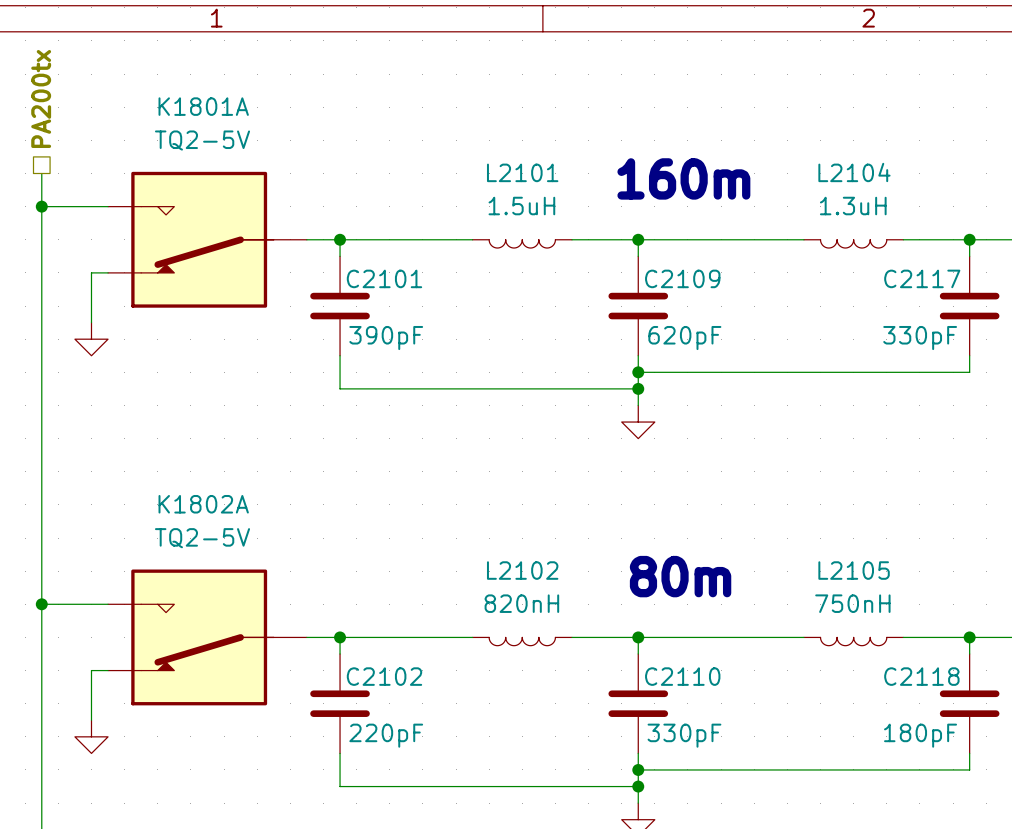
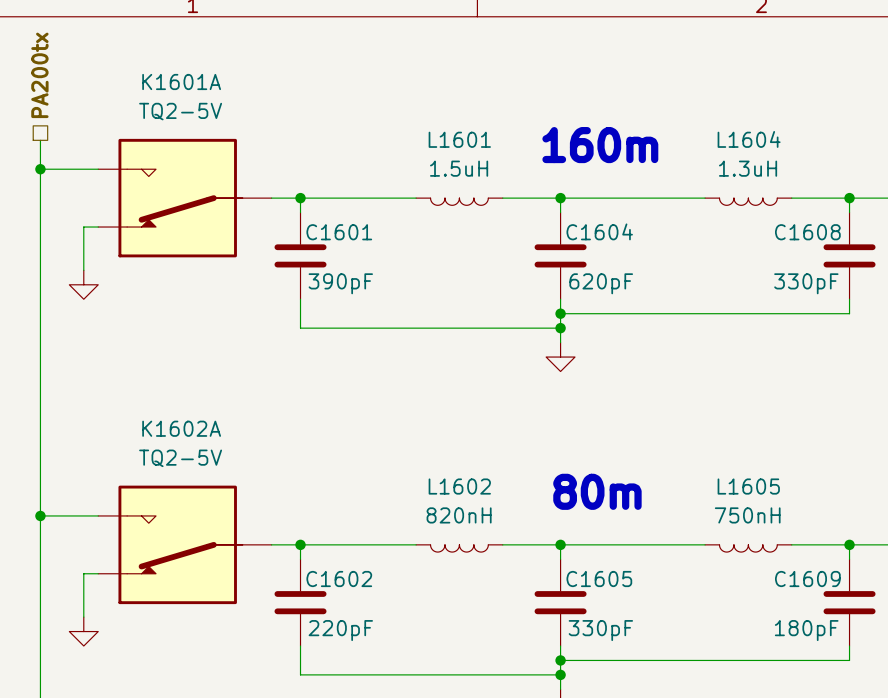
K1801A name: K1801A (203, 106) -> K1601A (181, 81)
L2101 name: L2101 (522, 172) -> L1601 (459, 139)
L2104 name: L2104 (854, 172) -> L1604 (749, 139)
C2101 name: C2101 (384, 278) -> C1601 (339, 232)
C2109 name: C2109 (682, 278) -> C1604 (599, 231)
C2117 name: C2117 (922, 278) -> C1608 (807, 232)
K1802A name: K1802A (203, 504) -> K1602A (181, 428)
L2102 name: L2102 (522, 570) -> L1602 (459, 486)
L2105 name: L2105 (854, 570) -> L1605 (748, 486)
C2102 name: C2102 (384, 676) -> C1602 (339, 579)
C2110 name: C2110 (682, 676) -> C1605 (599, 579)
C2118 name: C2118 (921, 676) -> C1609 (807, 579)

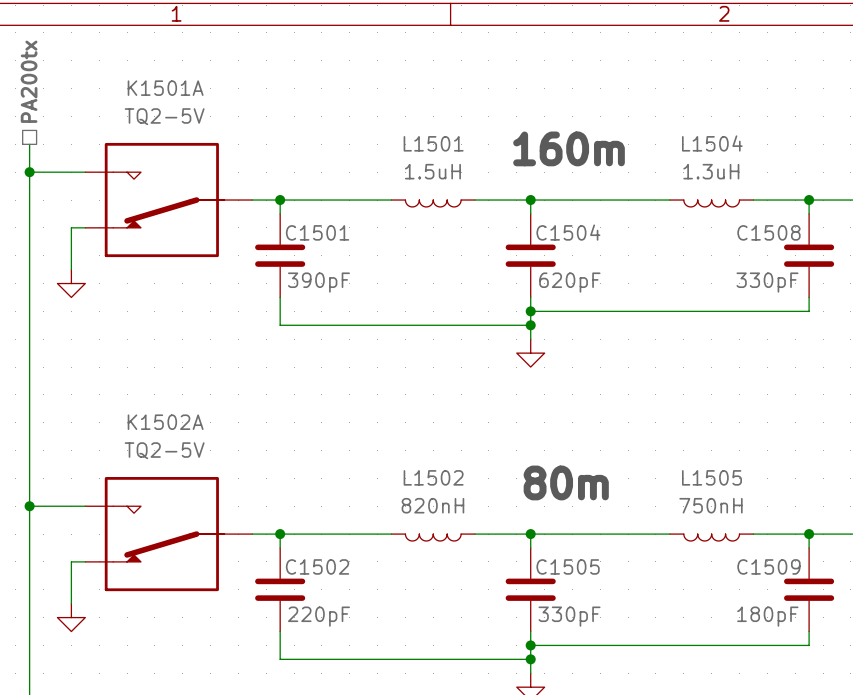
K1601A name: K1601A (181, 81) -> K1501A (165, 88)
L1601 name: L1601 (459, 139) -> L1501 (433, 143)
L1604 name: L1604 (749, 139) -> L1504 (712, 143)
C1604 name: C1604 (599, 231) -> C1504 (568, 232)
C1601 name: C1601 (339, 232) -> C1501 (317, 232)
C1608 name: C1608 (807, 232) -> C1508 (768, 232)
K1602A name: K1602A (181, 428) -> K1502A (165, 422)
L1602 name: L1602 (459, 486) -> L1502 (433, 477)
L1605 name: L1605 (748, 486) -> L1505 (711, 477)
C1602 name: C1602 (339, 579) -> C1502 (317, 566)
C1605 name: C1605 (599, 579) -> C1505 (568, 566)
C1609 name: C1609 (807, 579) -> C1509 (768, 566)

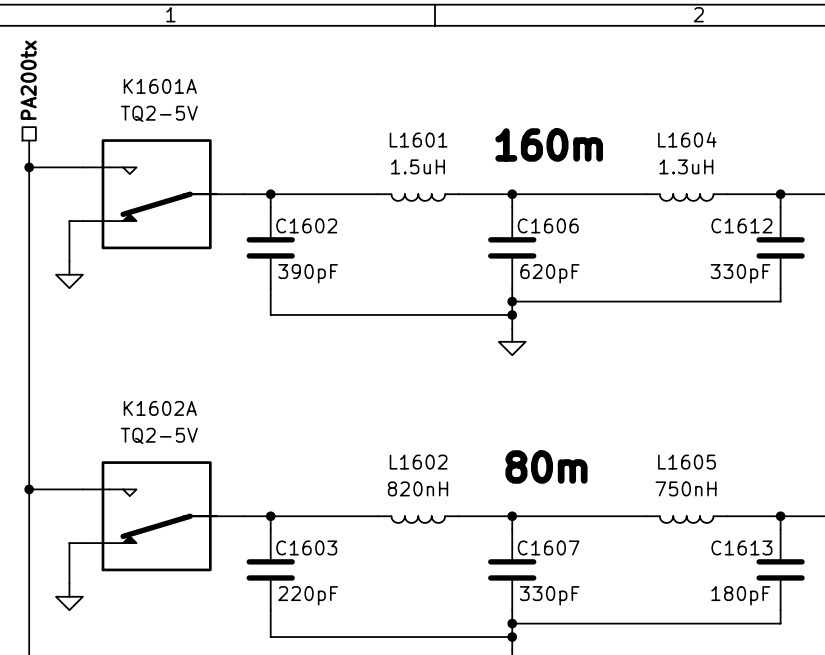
K1501A name: K1501A (165, 88) -> K1601A (160, 86)
L1501 name: L1501 (433, 143) -> L1601 (418, 140)
L1504 name: L1504 (712, 143) -> L1604 (687, 139)
C1501 name: C1501 (317, 232) -> C1602 (306, 225)
C1504 name: C1504 (568, 232) -> C1606 (548, 225)
C1508 name: C1508 (768, 232) -> C1612 (741, 225)
K1502A name: K1502A (165, 422) -> K1602A (160, 408)
L1502 name: L1502 (433, 477) -> L1602 (418, 462)
L1505 name: L1505 (711, 477) -> L1605 (686, 462)
C1502 name: C1502 (317, 566) -> C1603 (306, 547)
C1505 name: C1505 (568, 566) -> C1607 (548, 547)
C1509 name: C1509 (768, 566) -> C1613 (741, 547)

